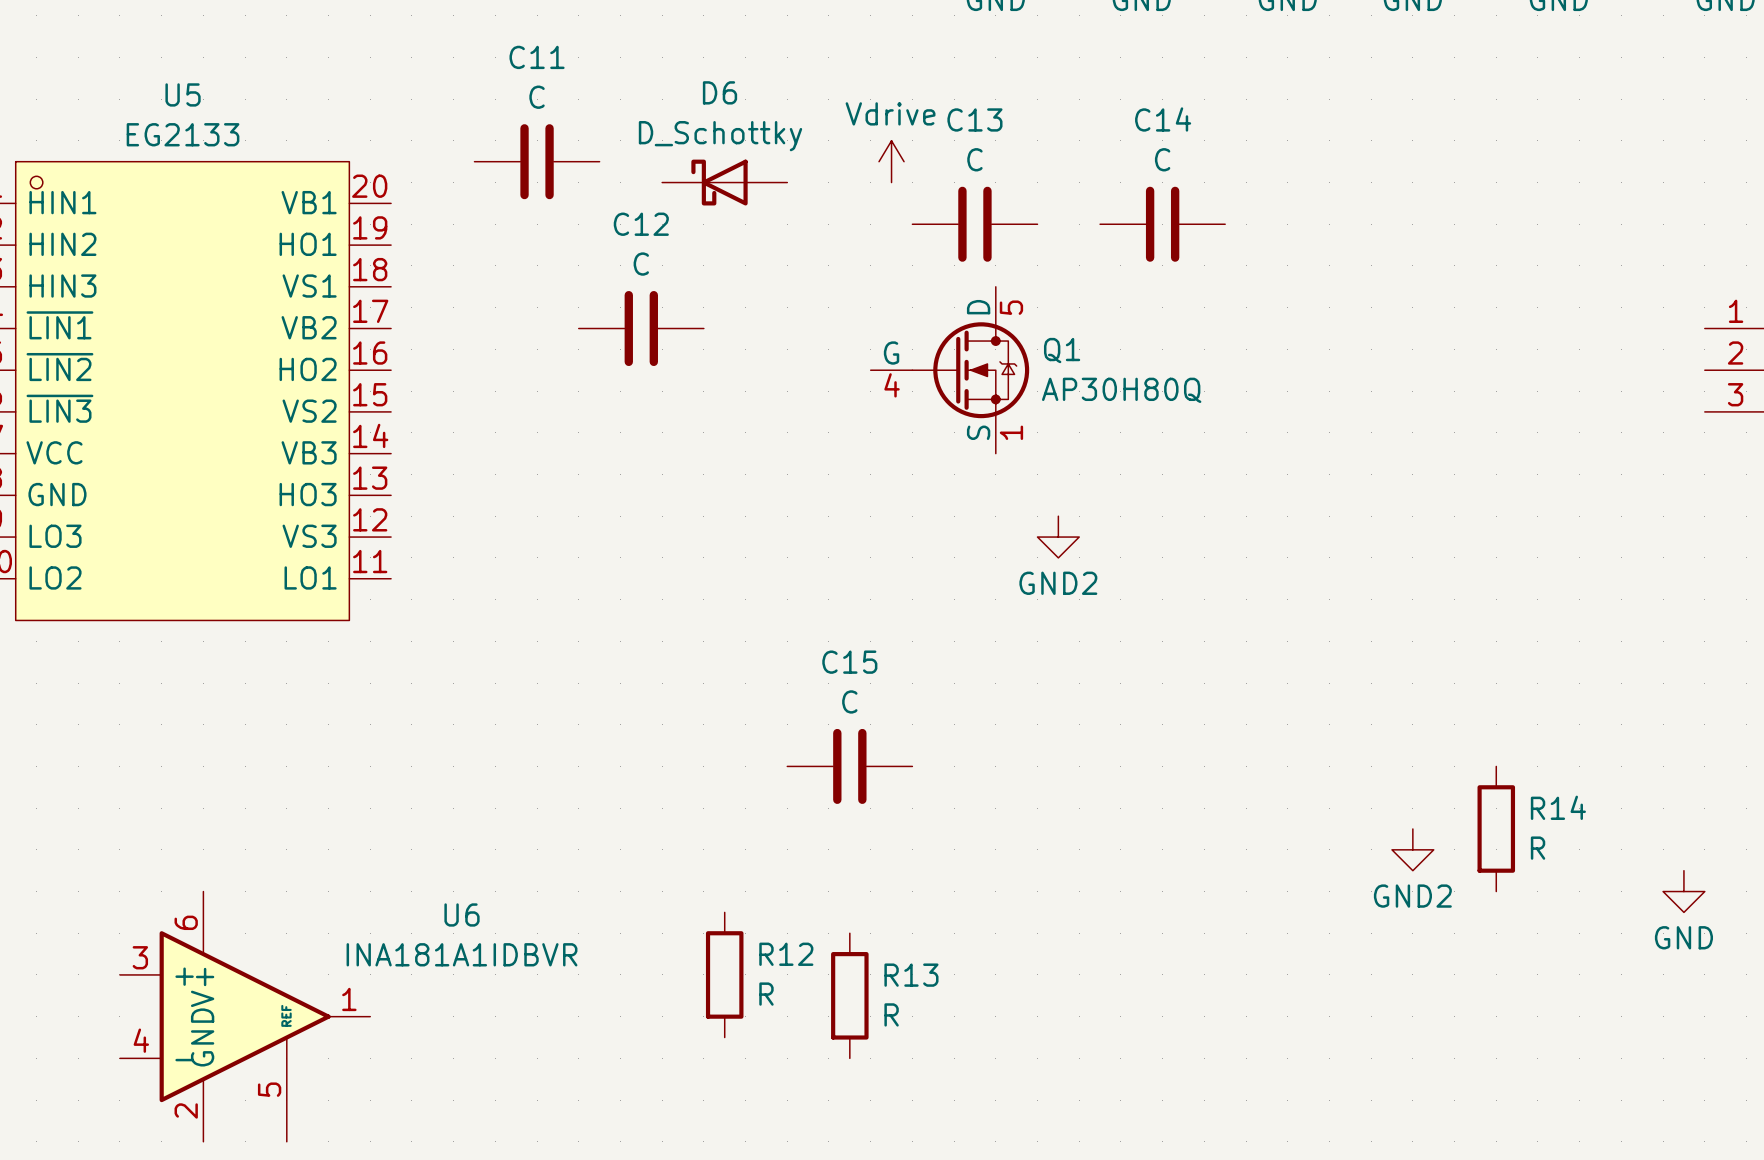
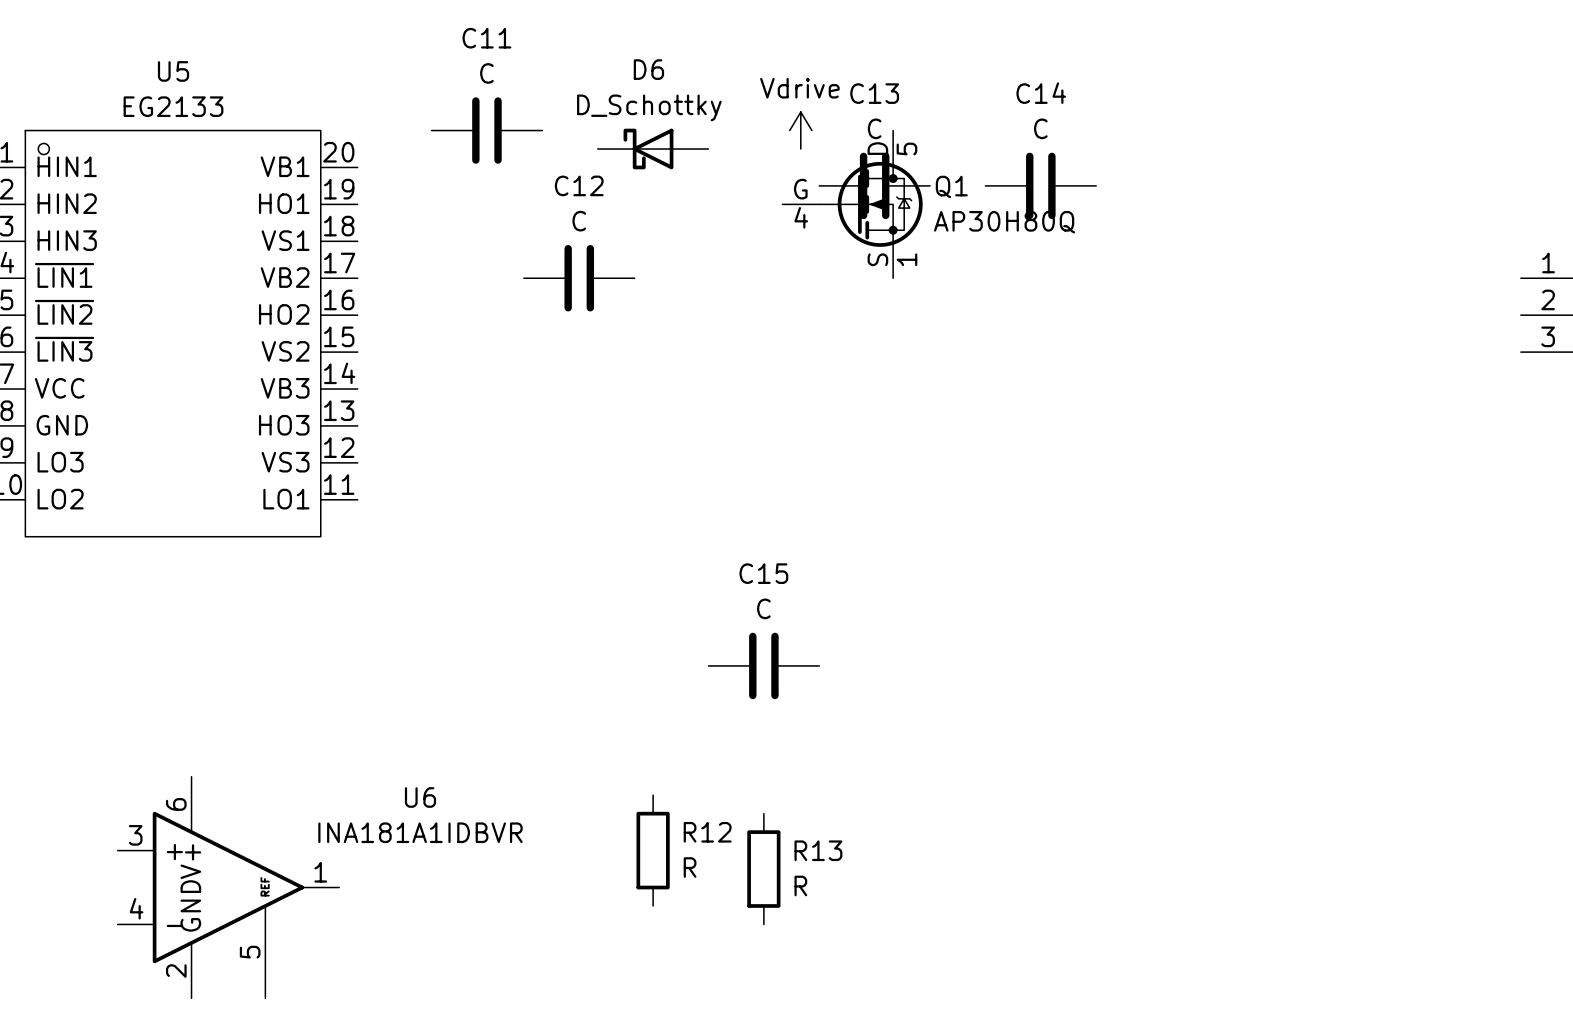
Q1 position: (949, 370) -> (852, 204)
power symbol: GND2 (1058, 537) -> none
R14: R (1496, 828) -> none
power symbol: GND2 (1412, 849) -> none
power symbol: GND (1683, 891) -> none

